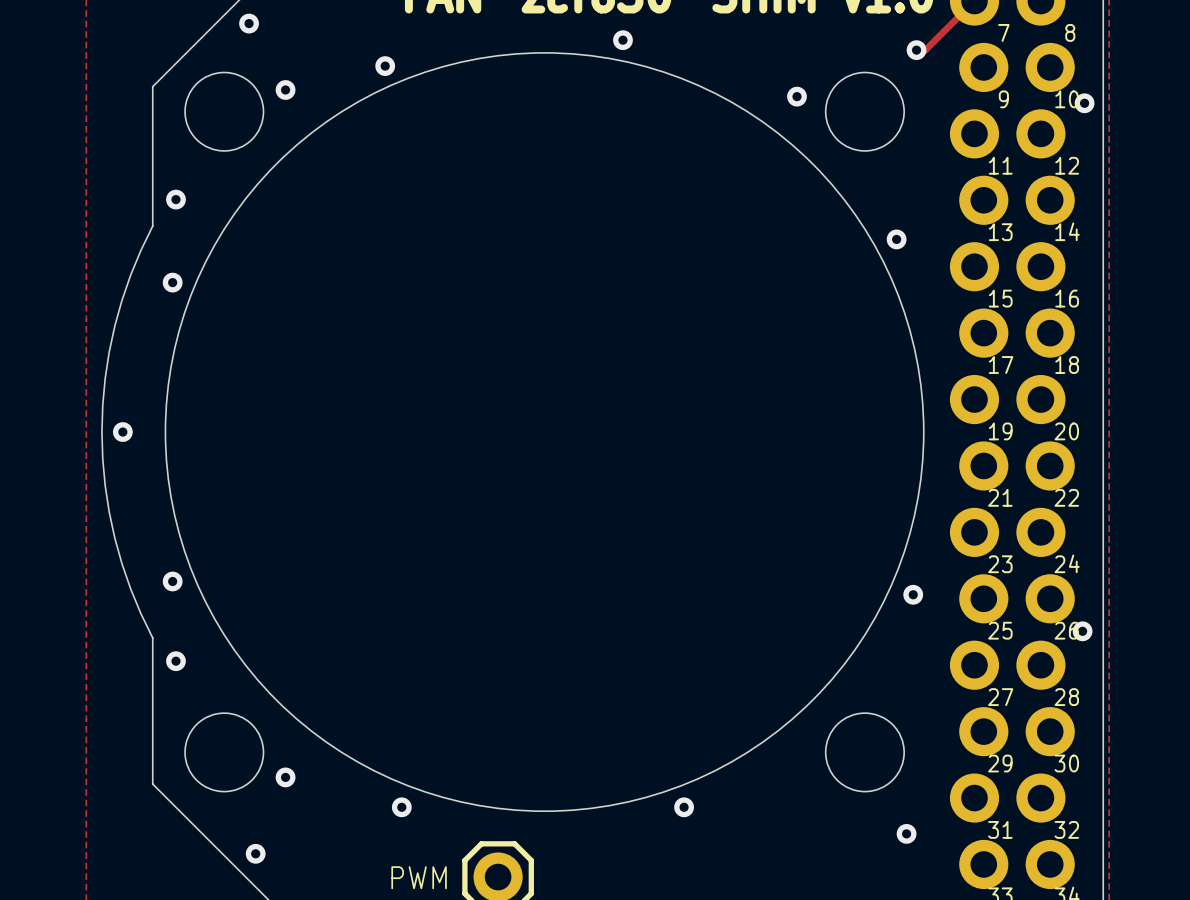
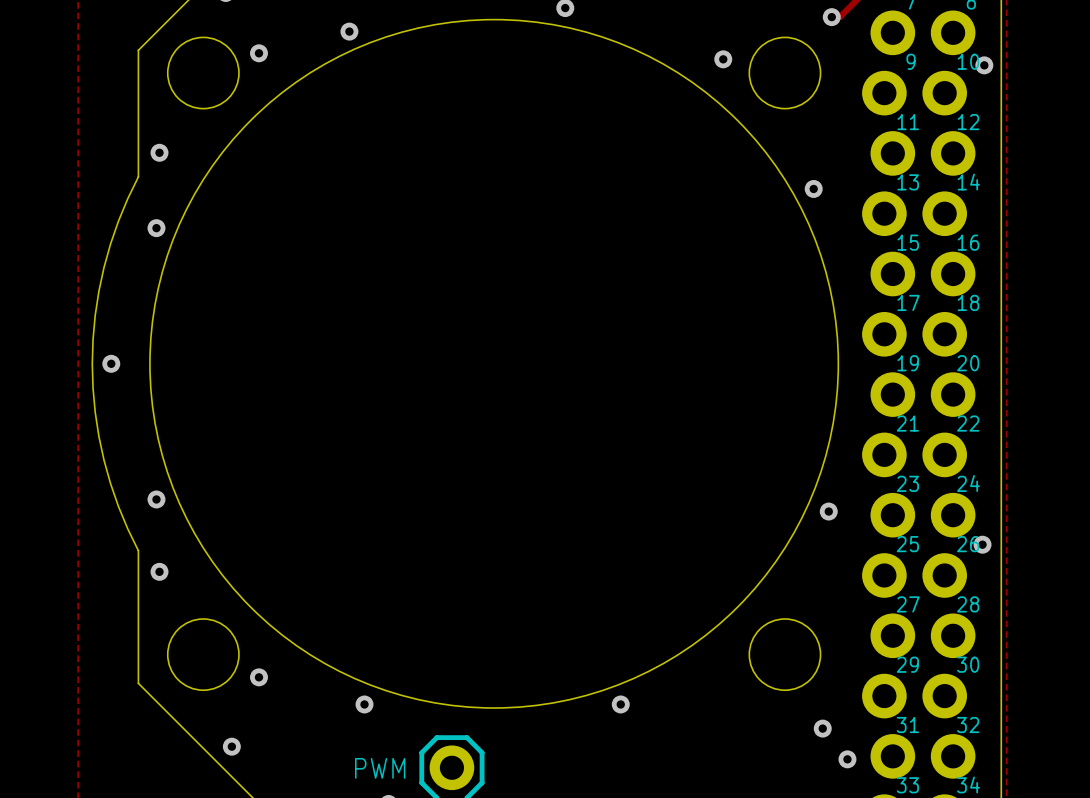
via: none -> (847, 759)

